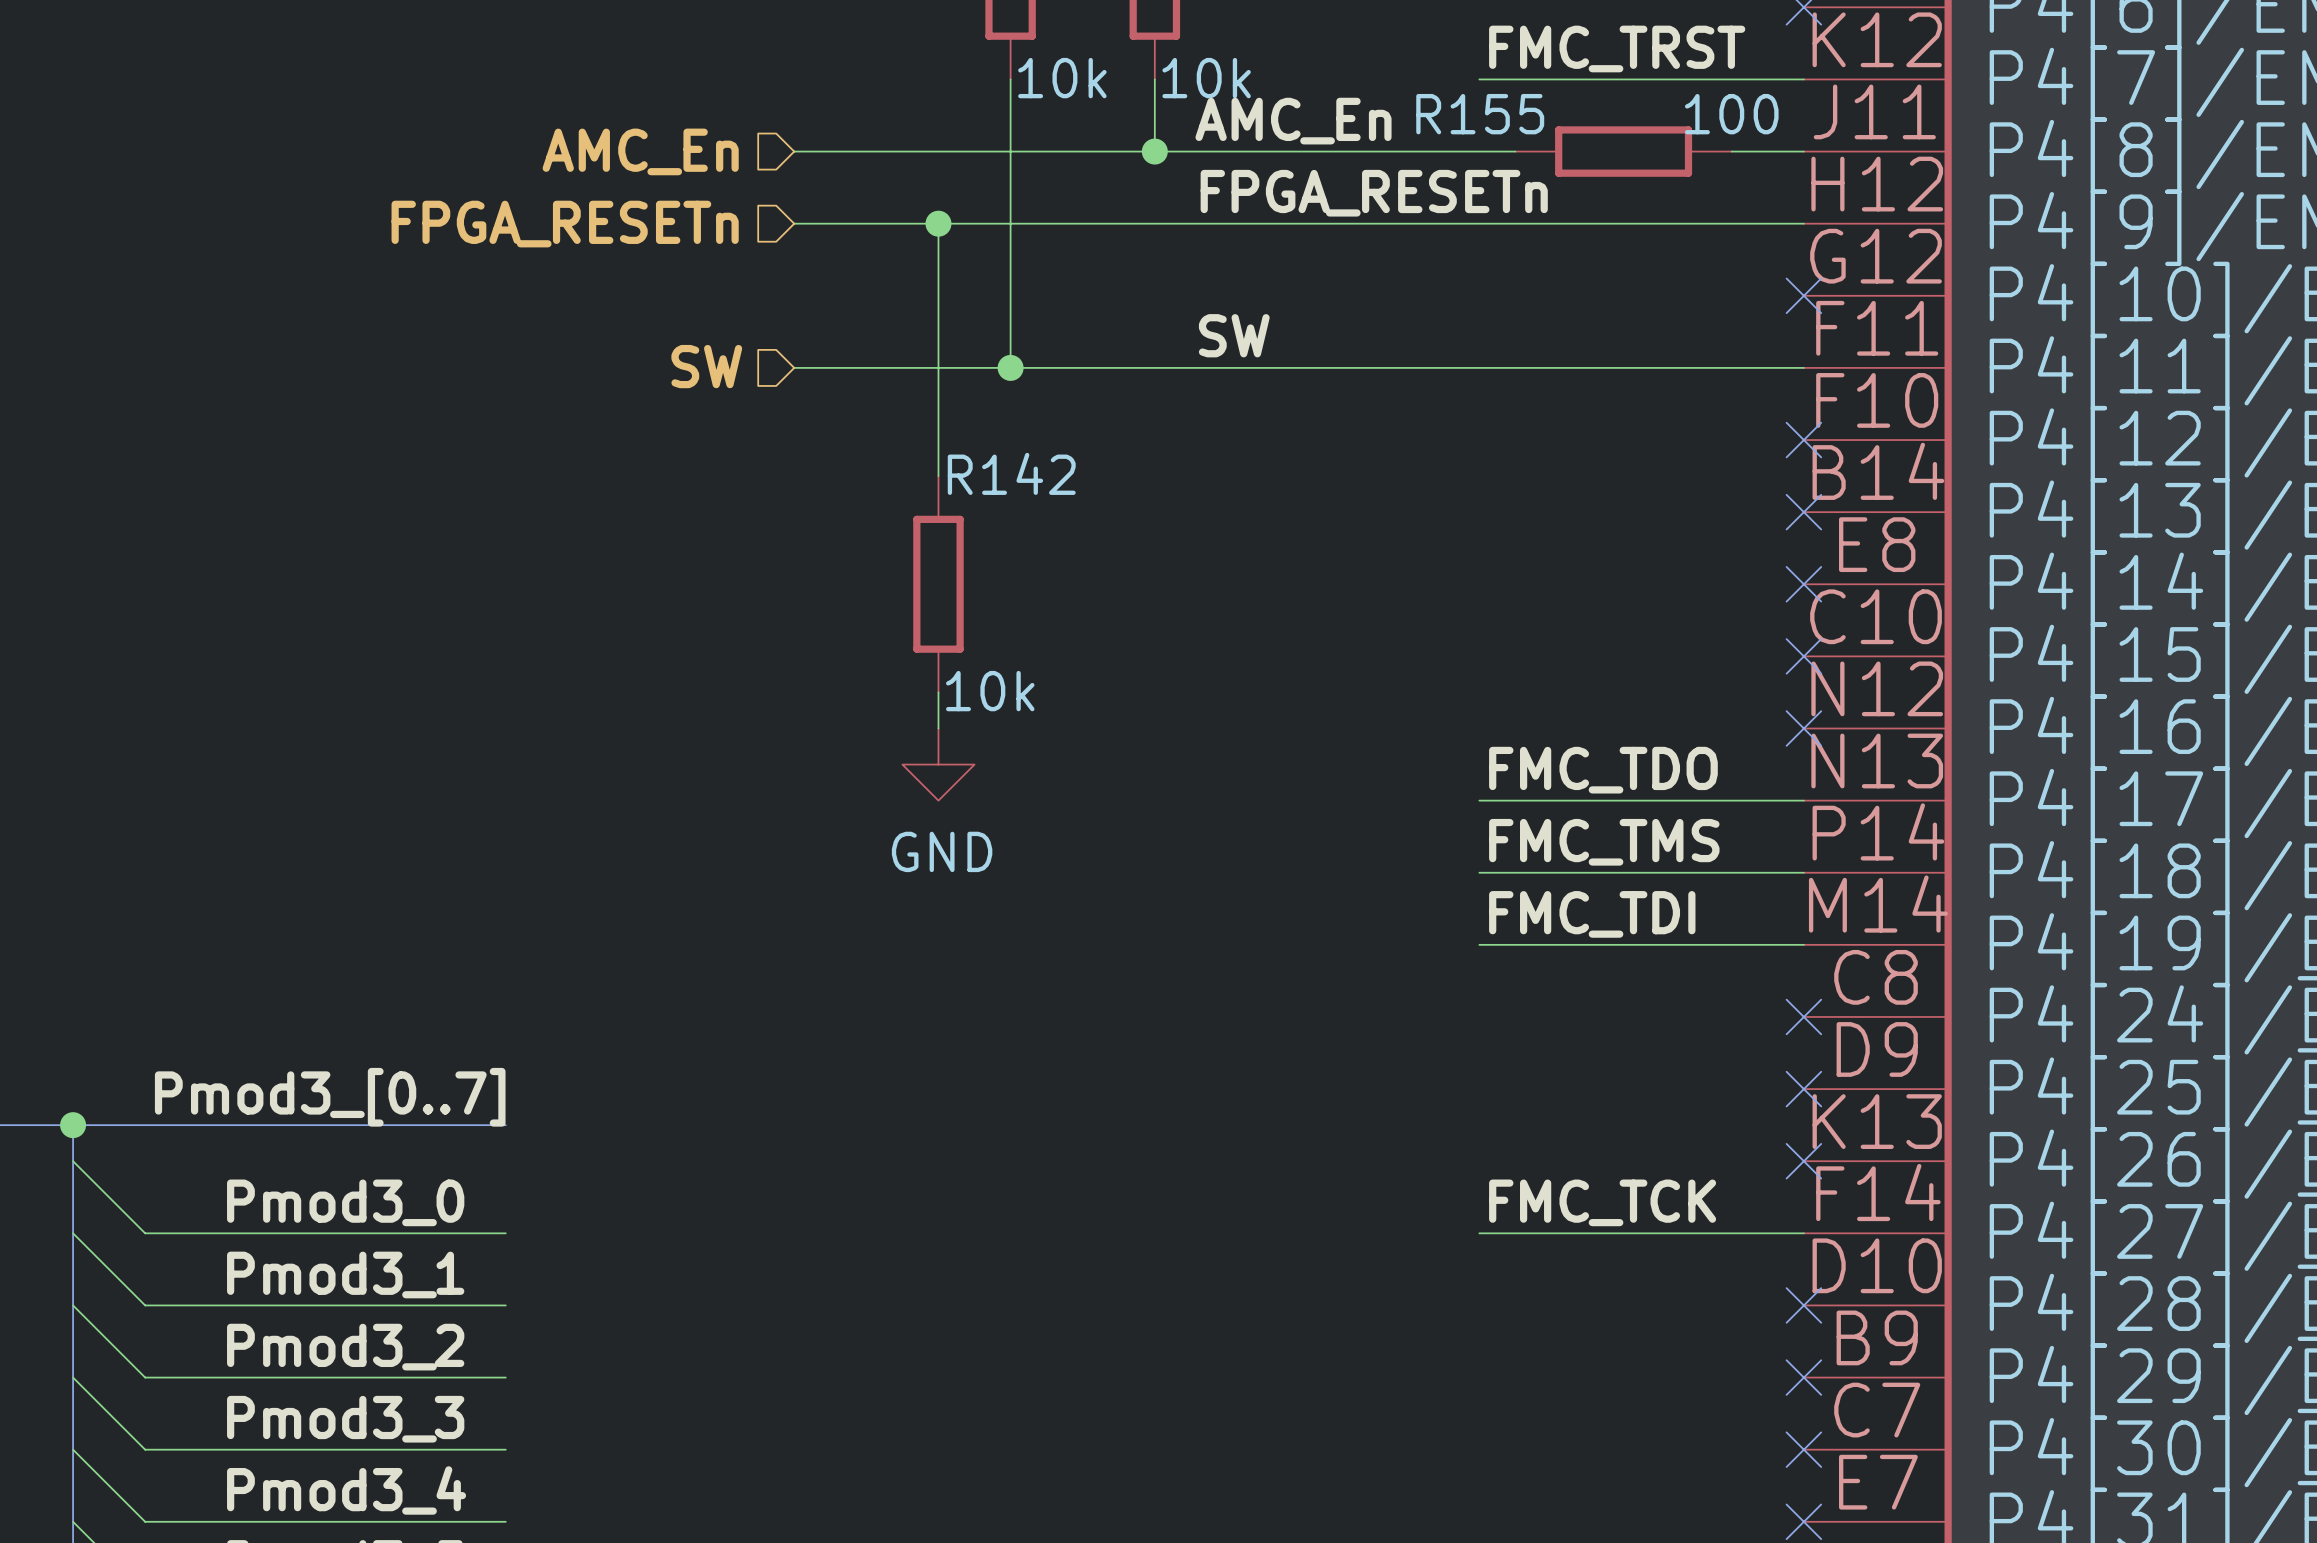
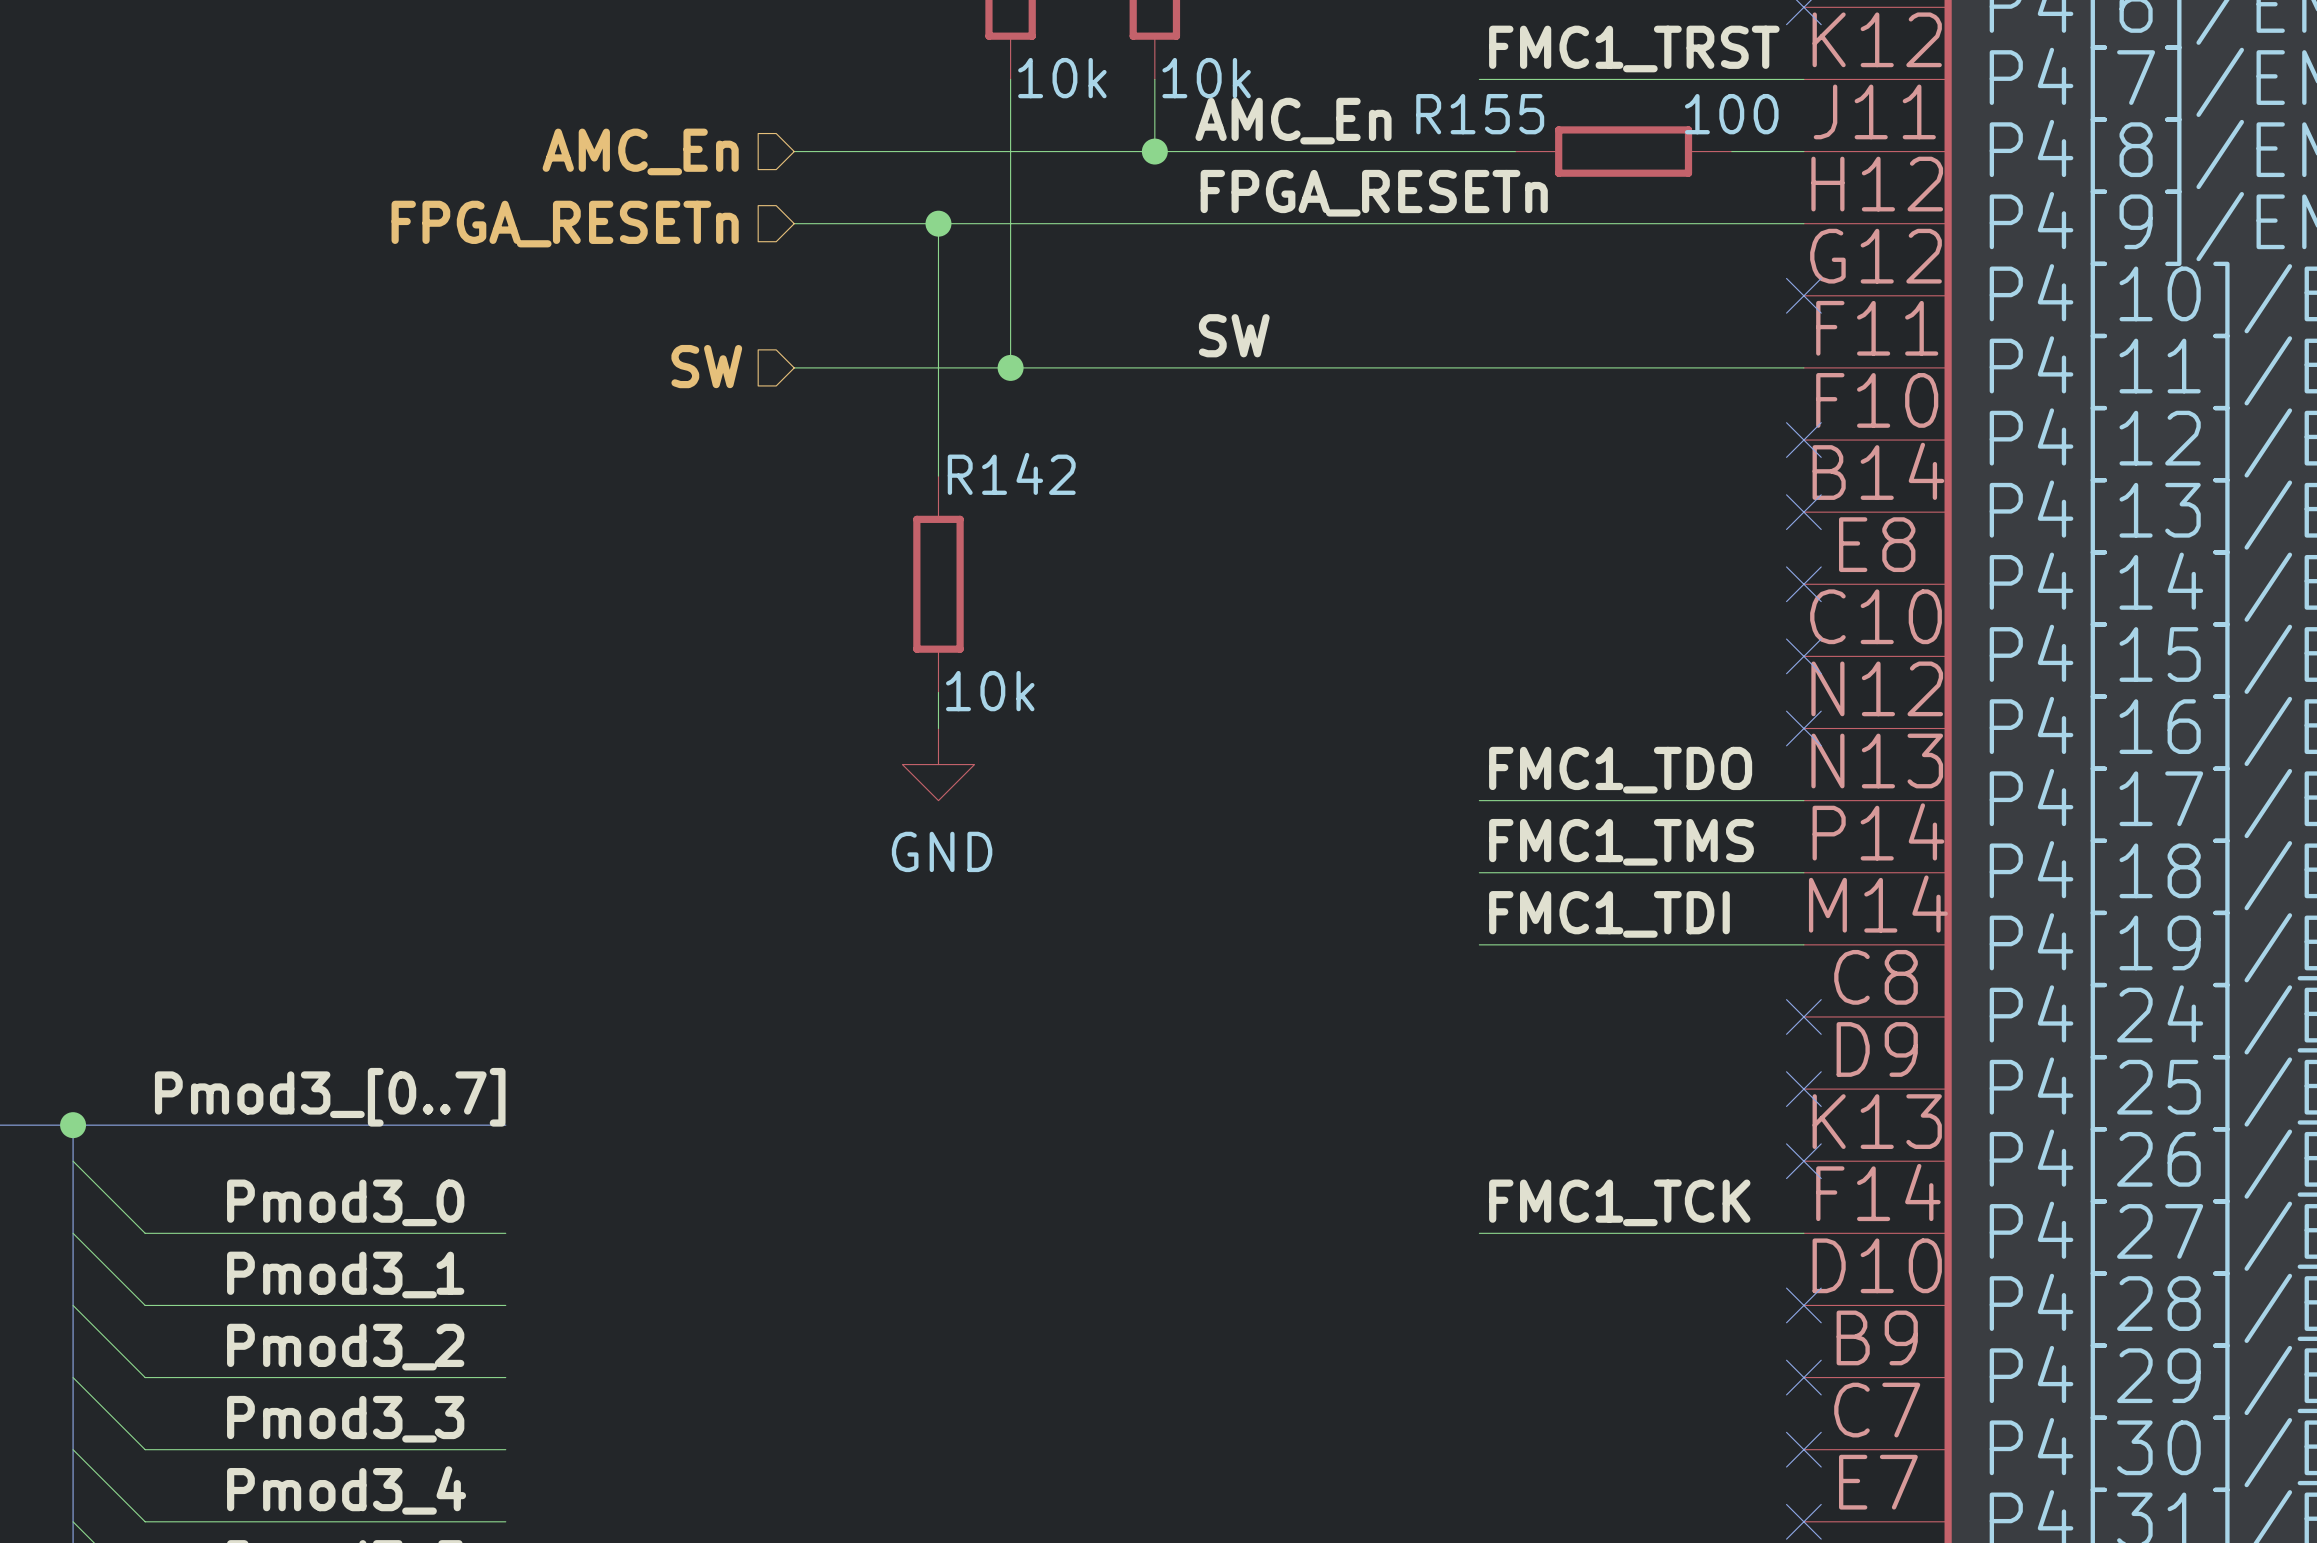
label: FMC_TRST (1617, 48) -> FMC1_TRST (1634, 48)
label: FMC_TDO (1603, 770) -> FMC1_TDO (1620, 770)
label: FMC_TMS (1604, 842) -> FMC1_TMS (1621, 842)
label: FMC_TDI (1592, 914) -> FMC1_TDI (1609, 914)
label: FMC_TCK (1602, 1202) -> FMC1_TCK (1619, 1202)

